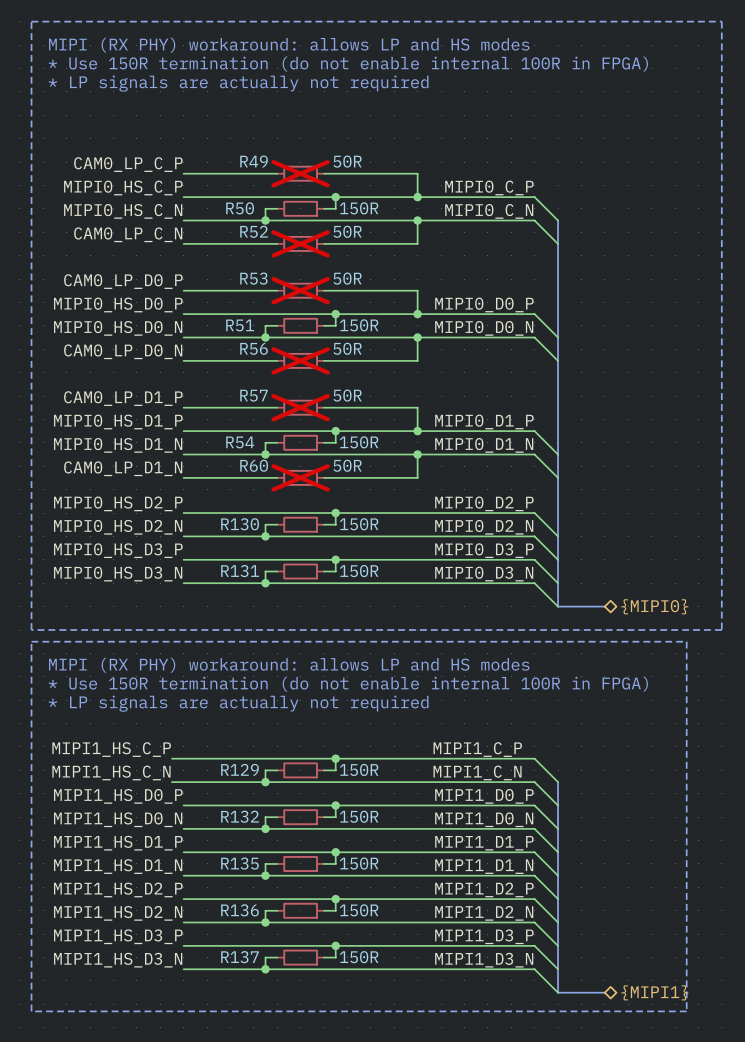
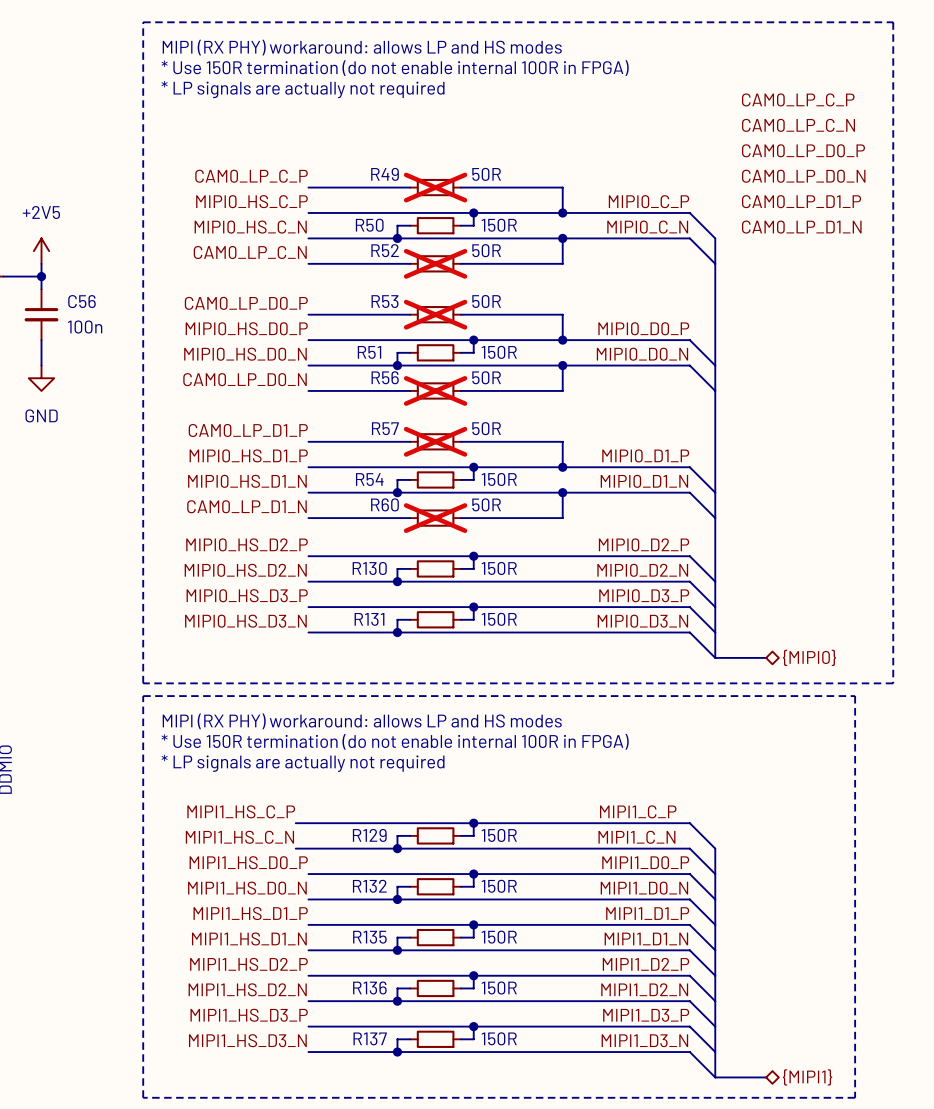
label: none -> CAM0_LP_C_P (798, 99)
label: none -> CAM0_LP_C_N (798, 125)
label: none -> CAM0_LP_D0_P (803, 150)
label: none -> CAM0_LP_D0_N (803, 176)
label: none -> CAM0_LP_D1_P (801, 201)
label: none -> CAM0_LP_D1_N (801, 227)

